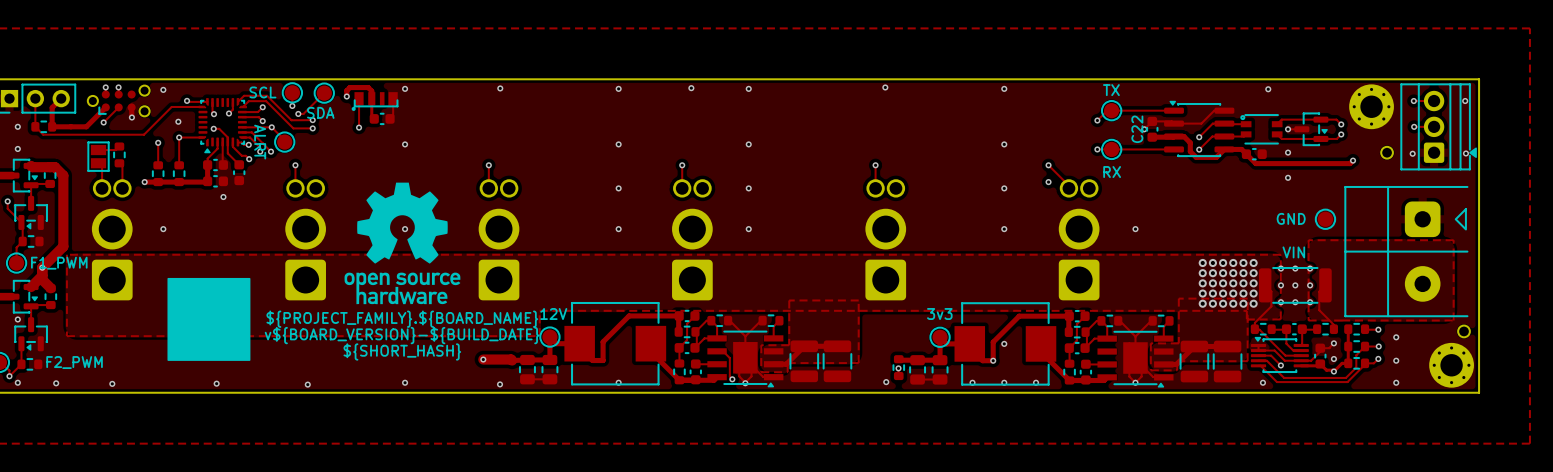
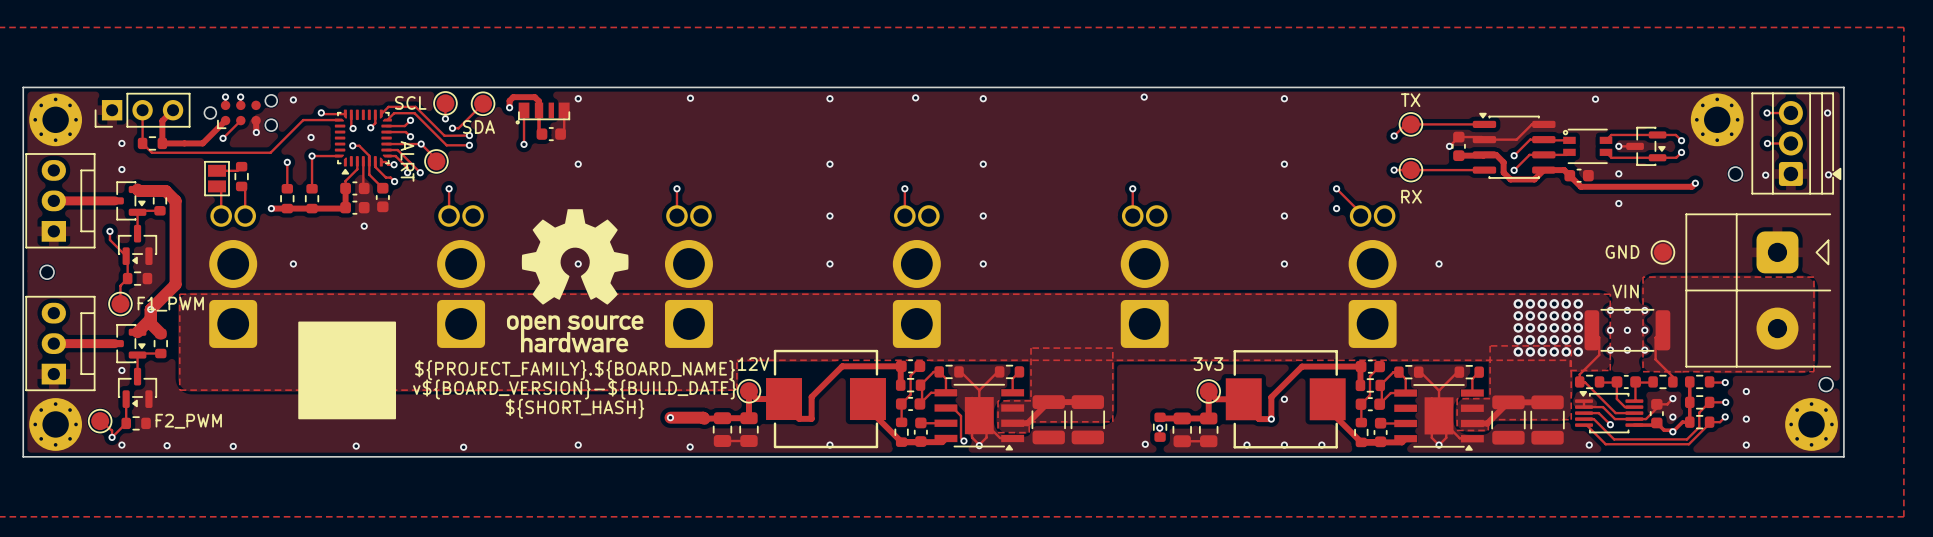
C22 name: C22 (1137, 129) -> none

